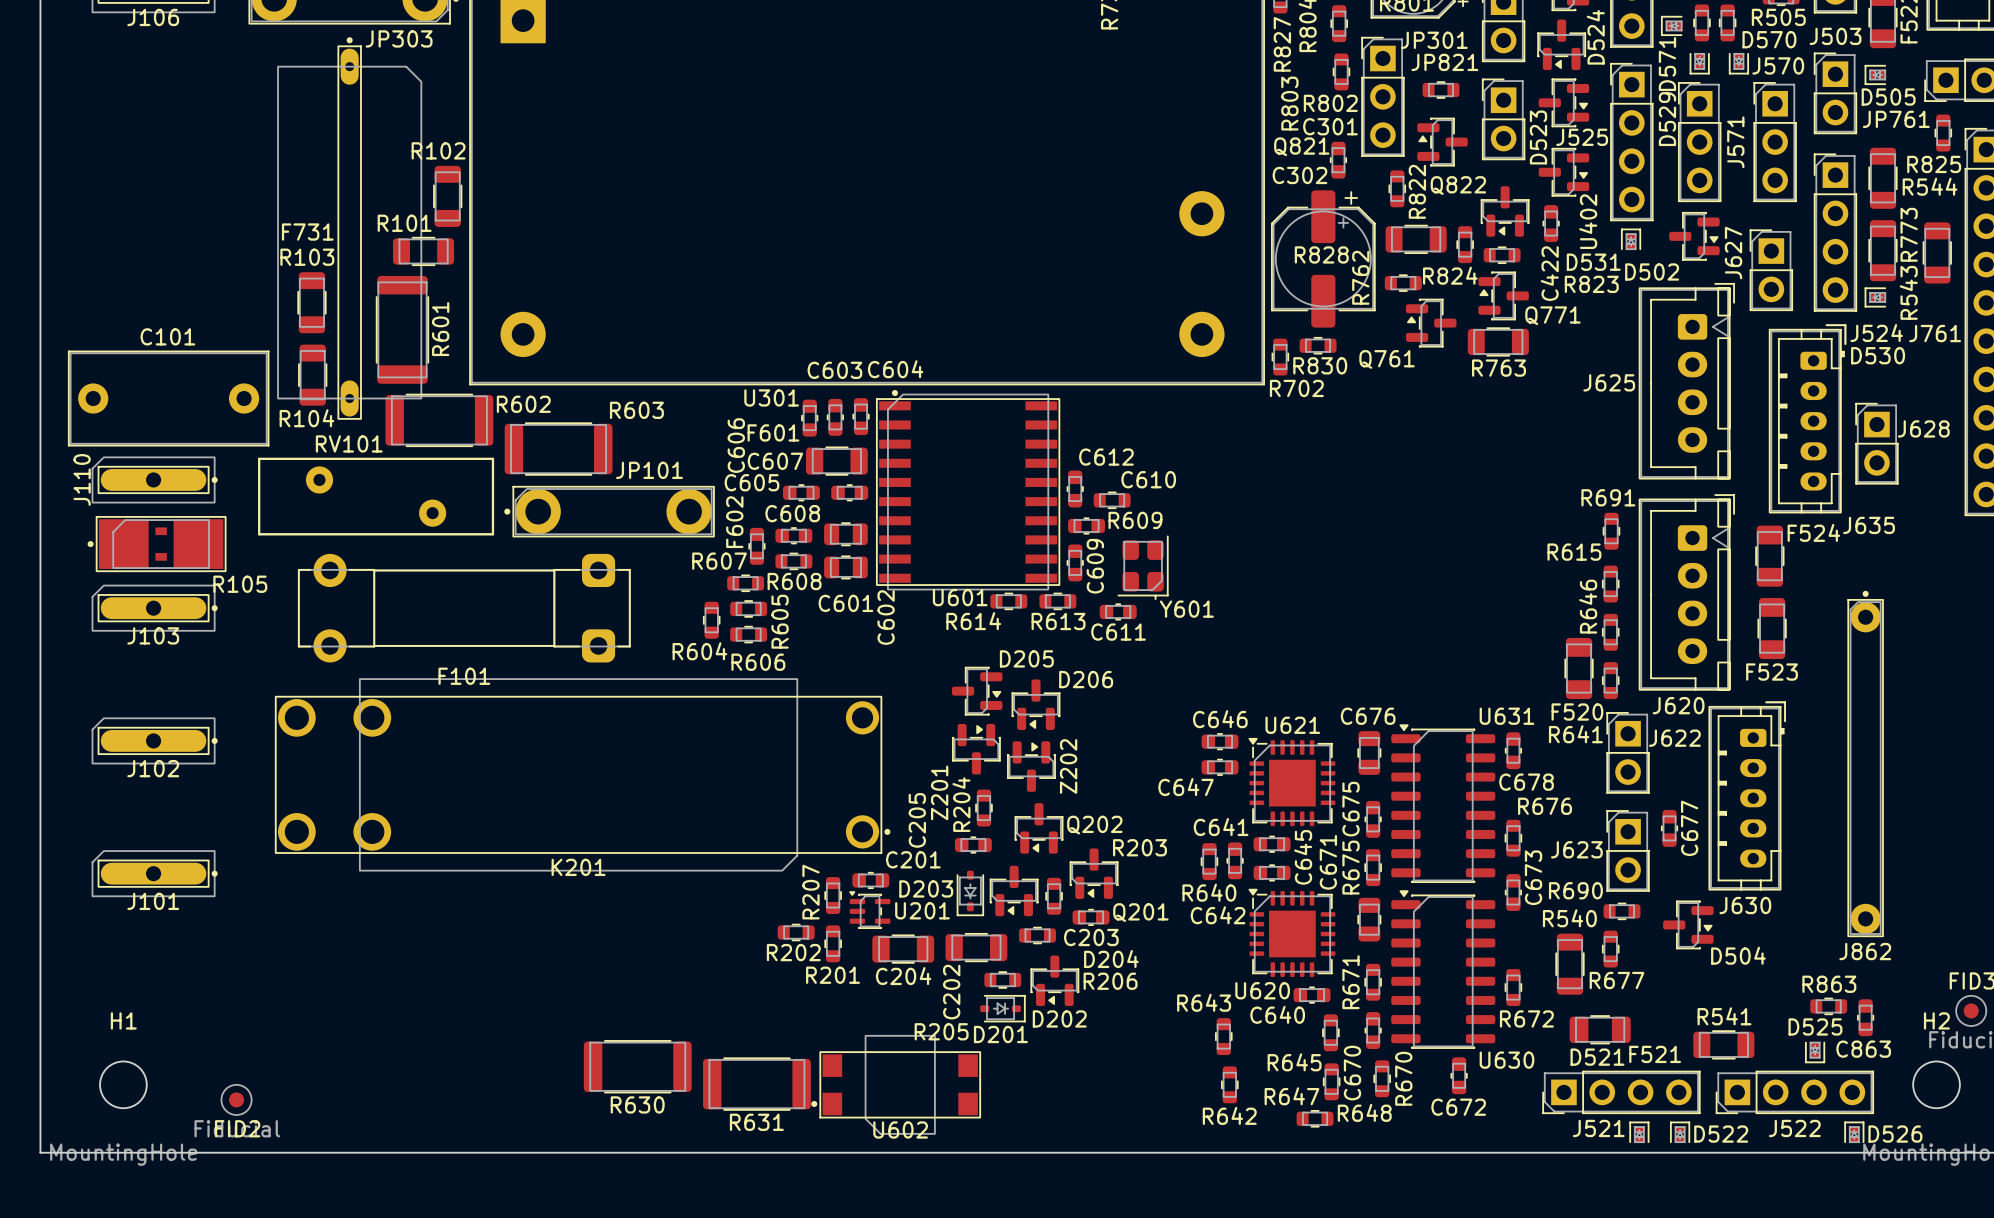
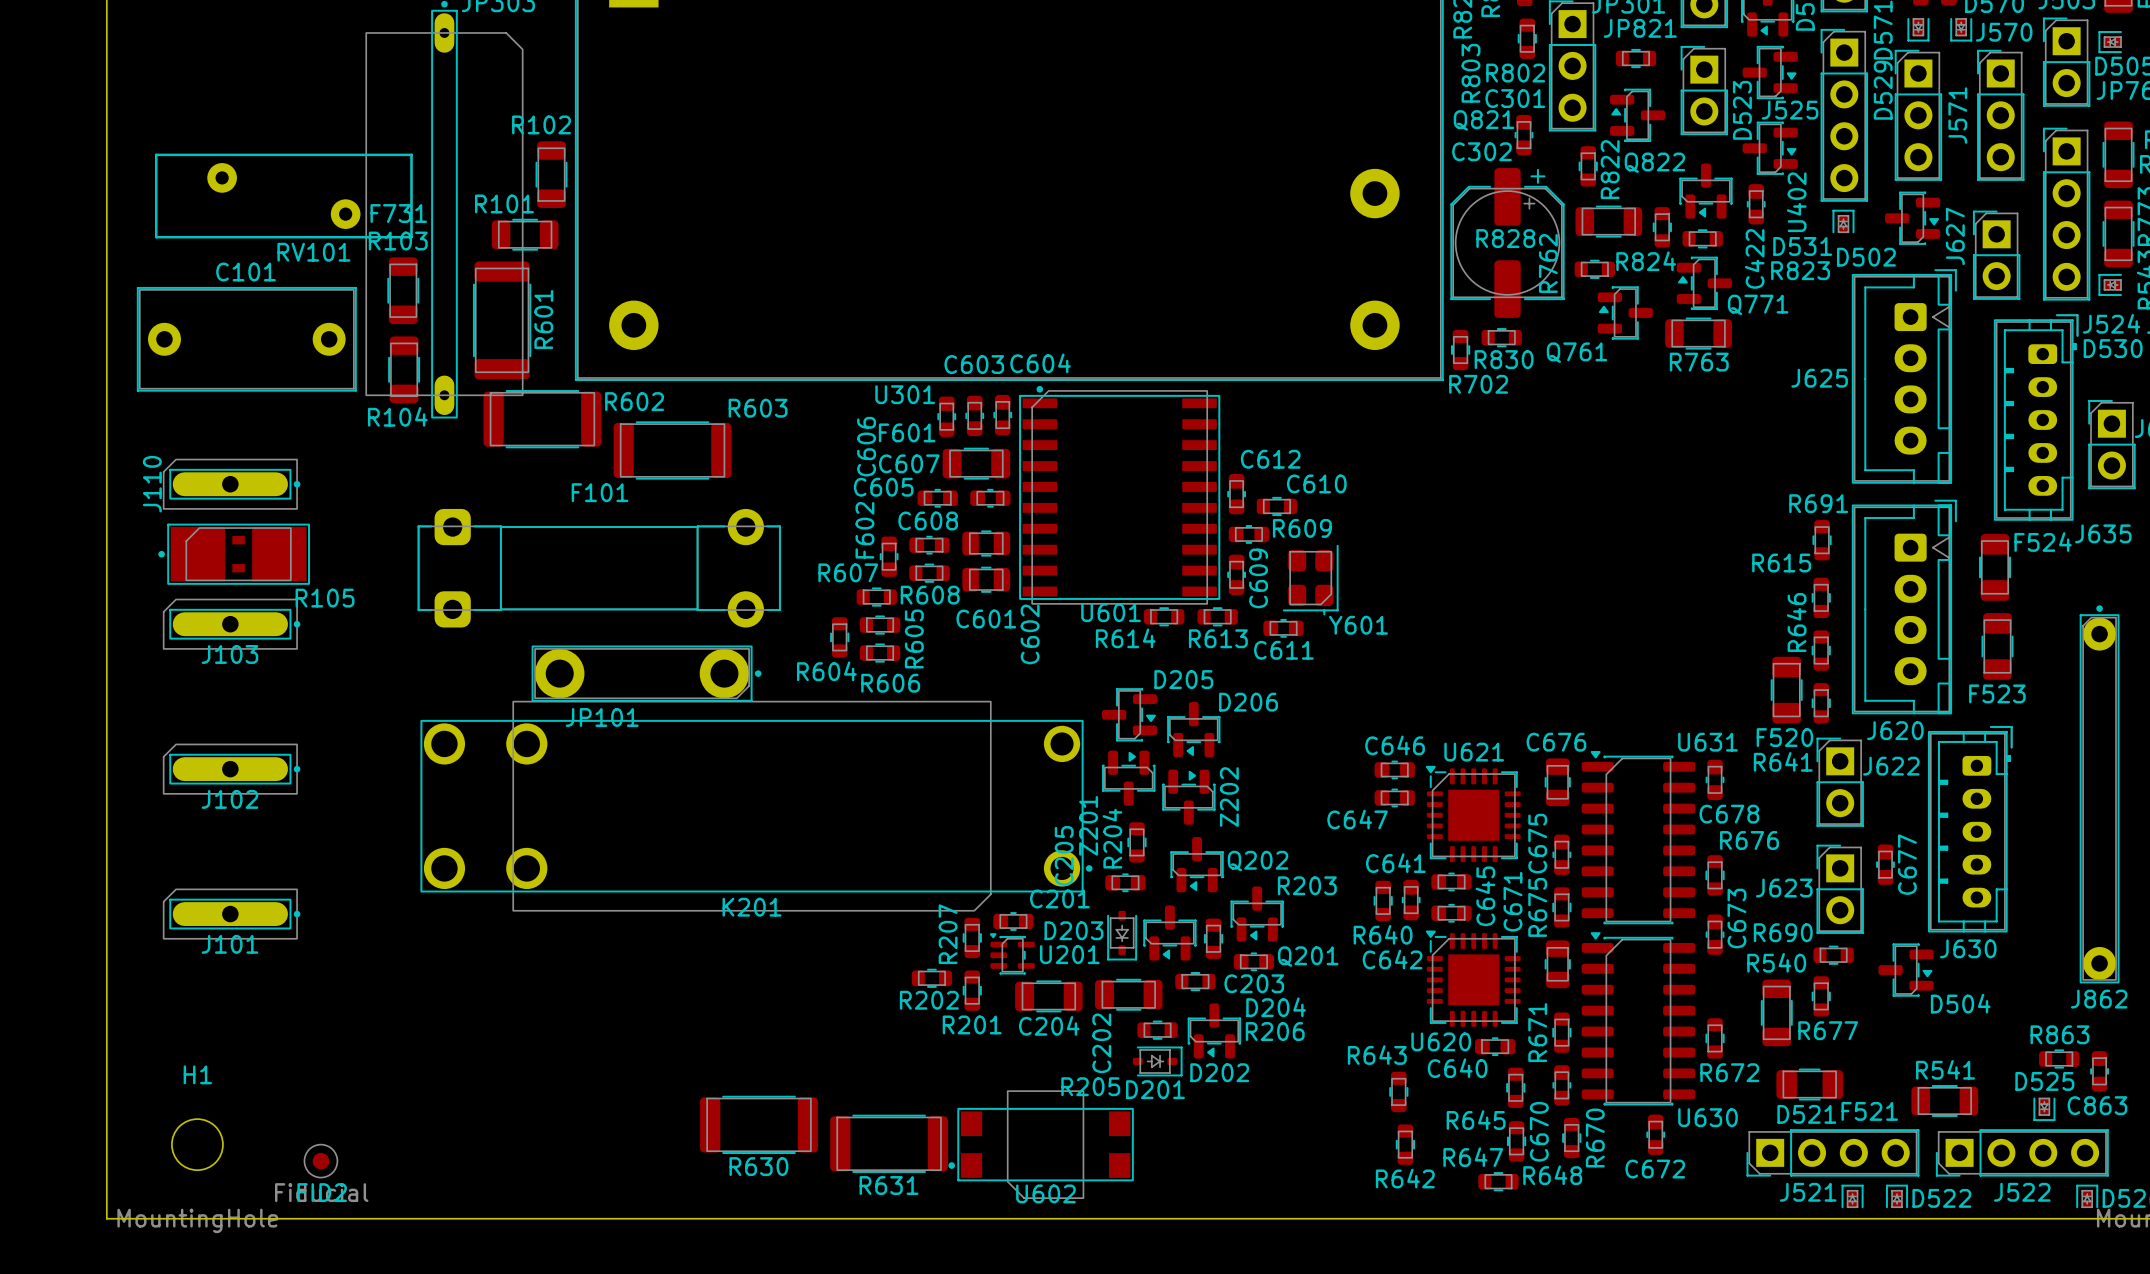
C101 position: (168, 398) -> (246, 339)
RV101 name position: RV101 (349, 443) -> RV101 (313, 252)
RV101 position: (376, 496) -> (283, 196)
JP101 rotation: 0° (609, 511) -> 180° (646, 673)
JP101 position: (609, 511) -> (646, 673)
F101 rotation: 0° (464, 608) -> 180° (599, 568)
K201 position: (582, 774) -> (756, 806)

